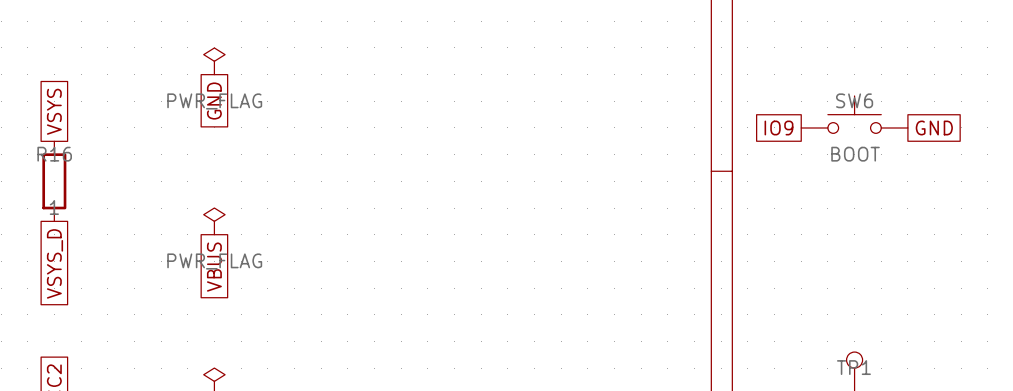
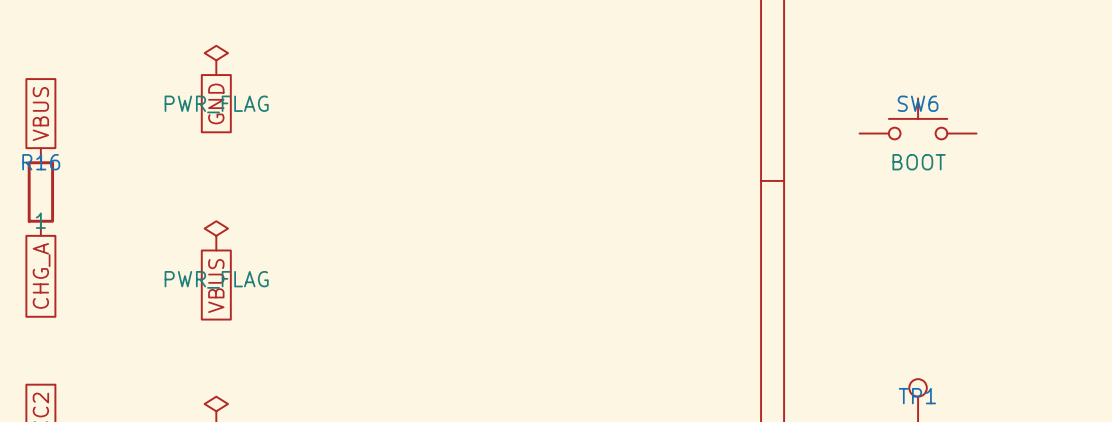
global label: VSYS (54, 111) -> VBUS (40, 114)
global label: IO9 (778, 127) -> none
global label: GND (934, 127) -> none
global label: VSYS_D (54, 263) -> CHG_A (41, 275)

